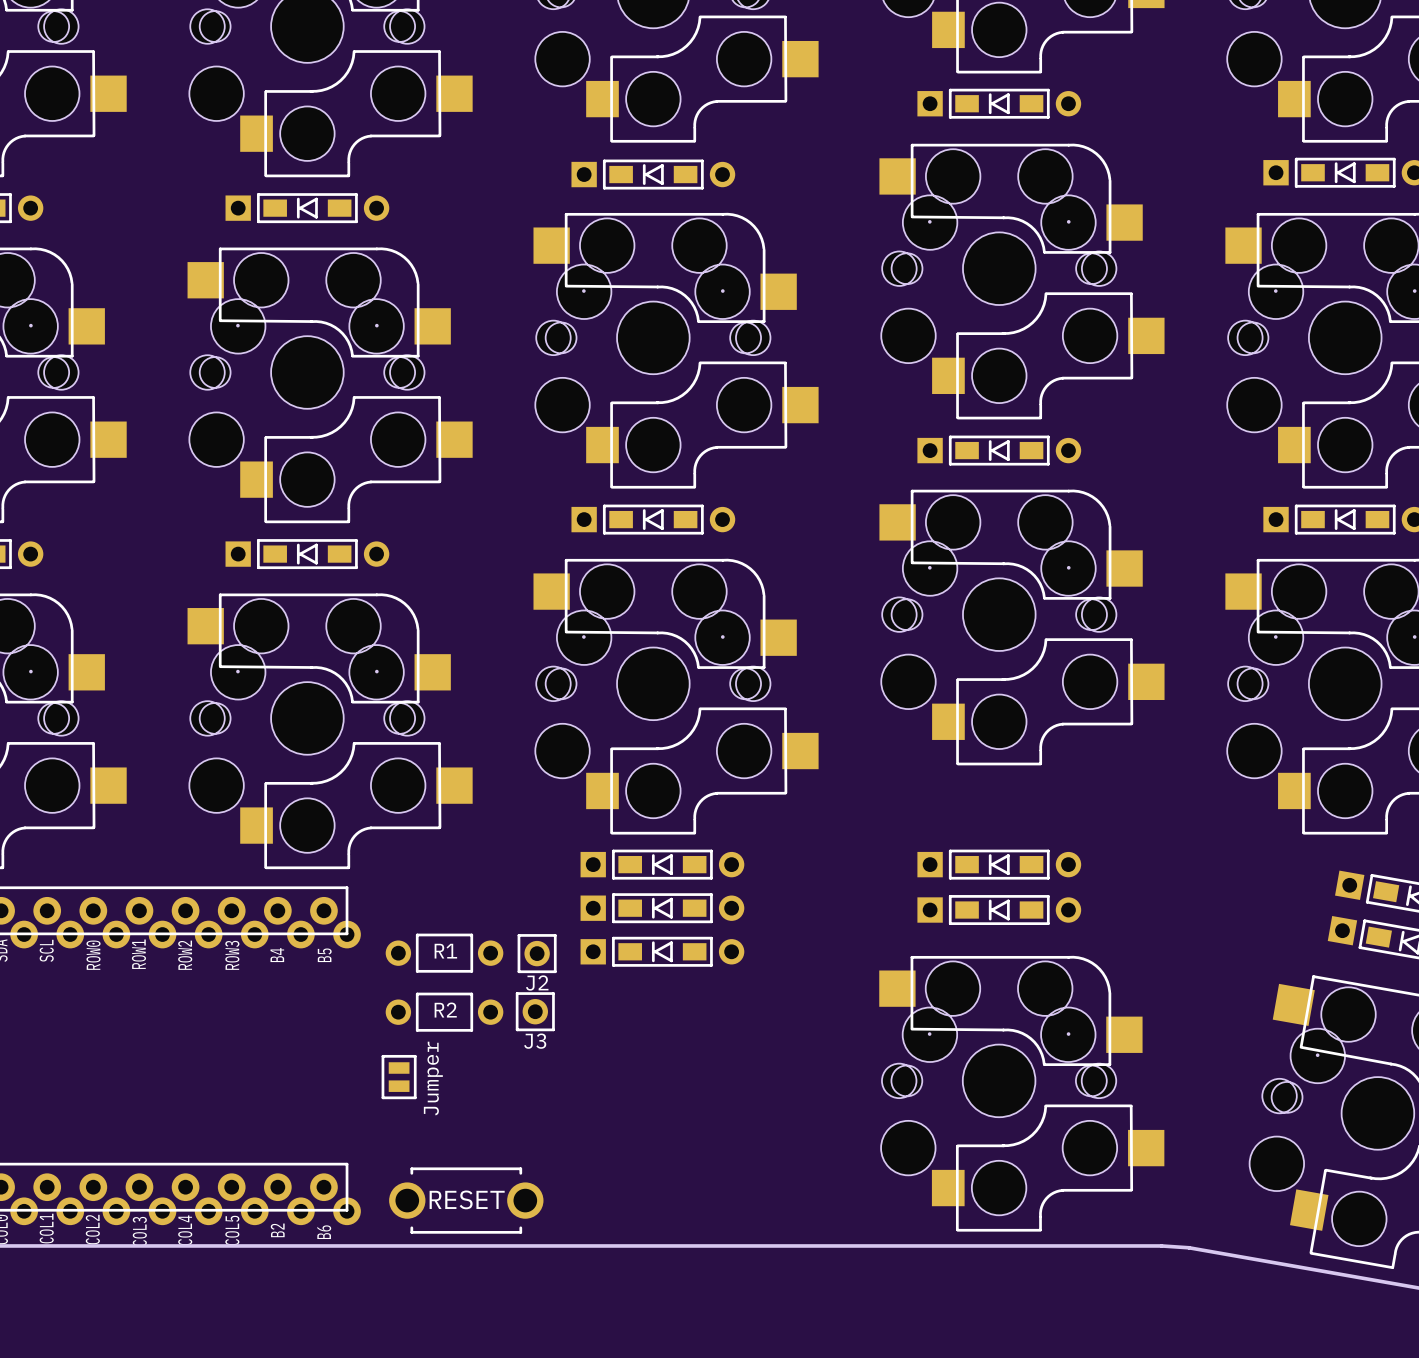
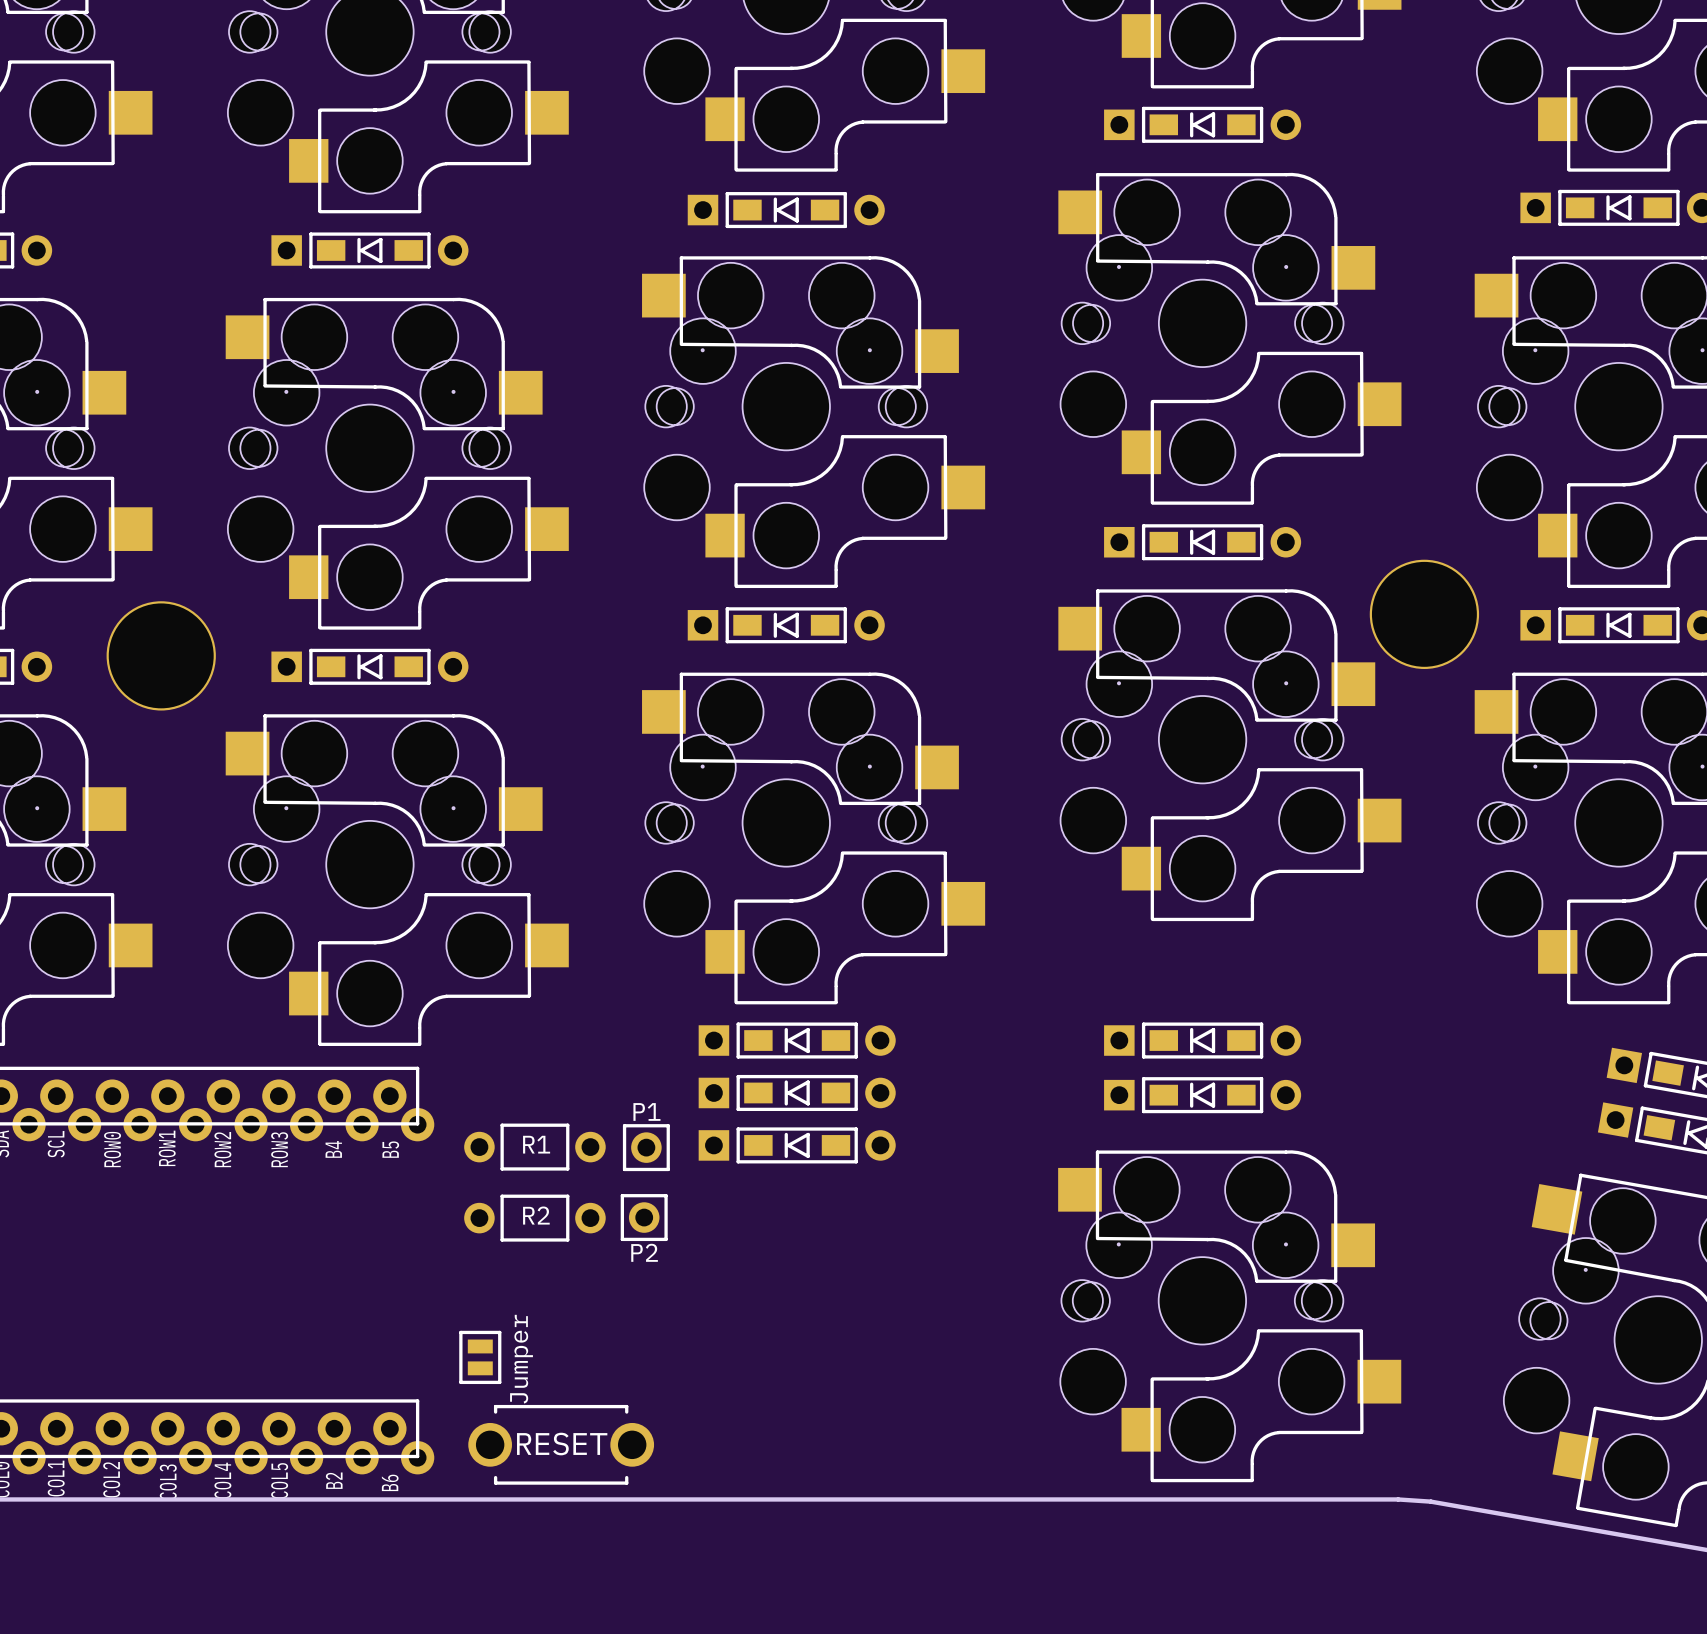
part: none -> (1424, 614)
part: none -> (161, 655)
J2 name: J2 (537, 983) -> P1 (646, 1111)
J3 name: J3 (535, 1041) -> P2 (644, 1252)
part position: (399, 1077) -> (480, 1357)

